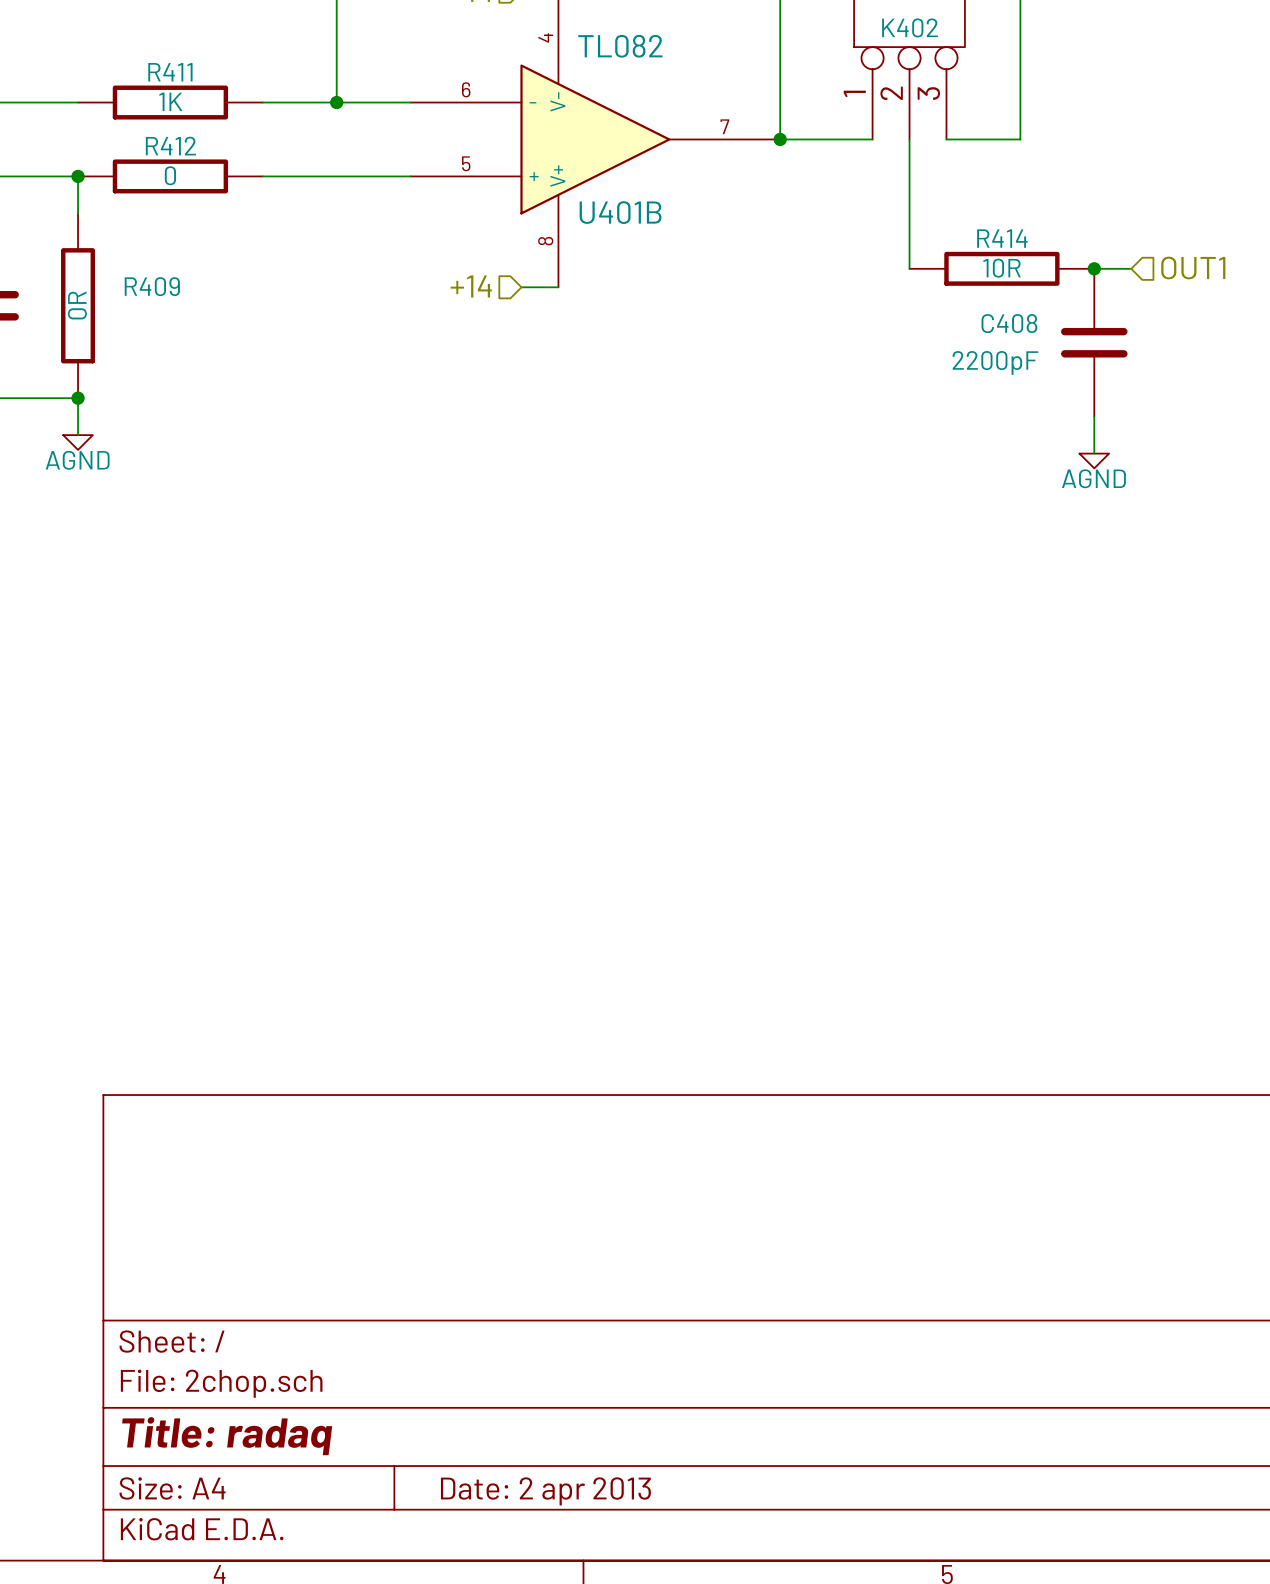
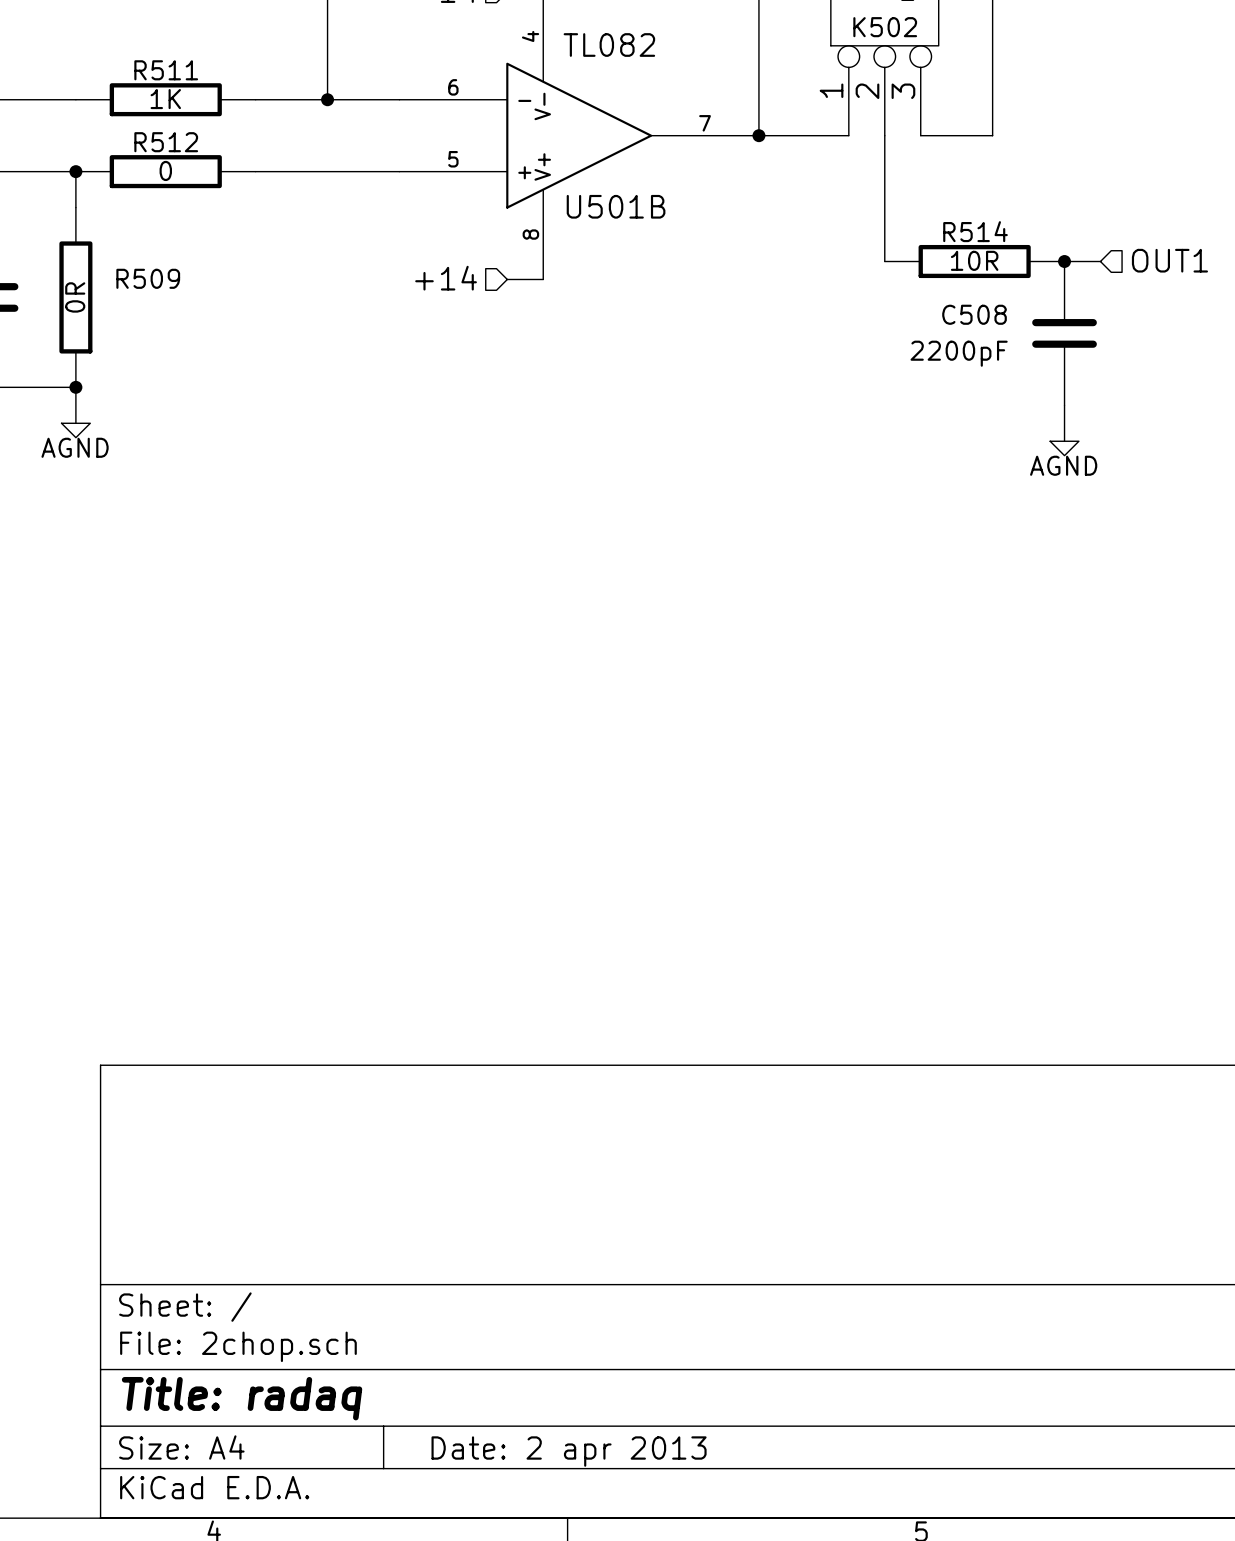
K402 name: K402 (909, 27) -> K502 (885, 27)
R411 name: R411 (170, 72) -> R511 (166, 70)
R412 name: R412 (170, 146) -> R512 (166, 142)
U401B name: U401B (620, 212) -> U501B (616, 206)
R414 name: R414 (1002, 238) -> R514 (975, 231)
R409 name: R409 (152, 286) -> R509 (148, 278)
C408 name: C408 (1009, 323) -> C508 (974, 314)

